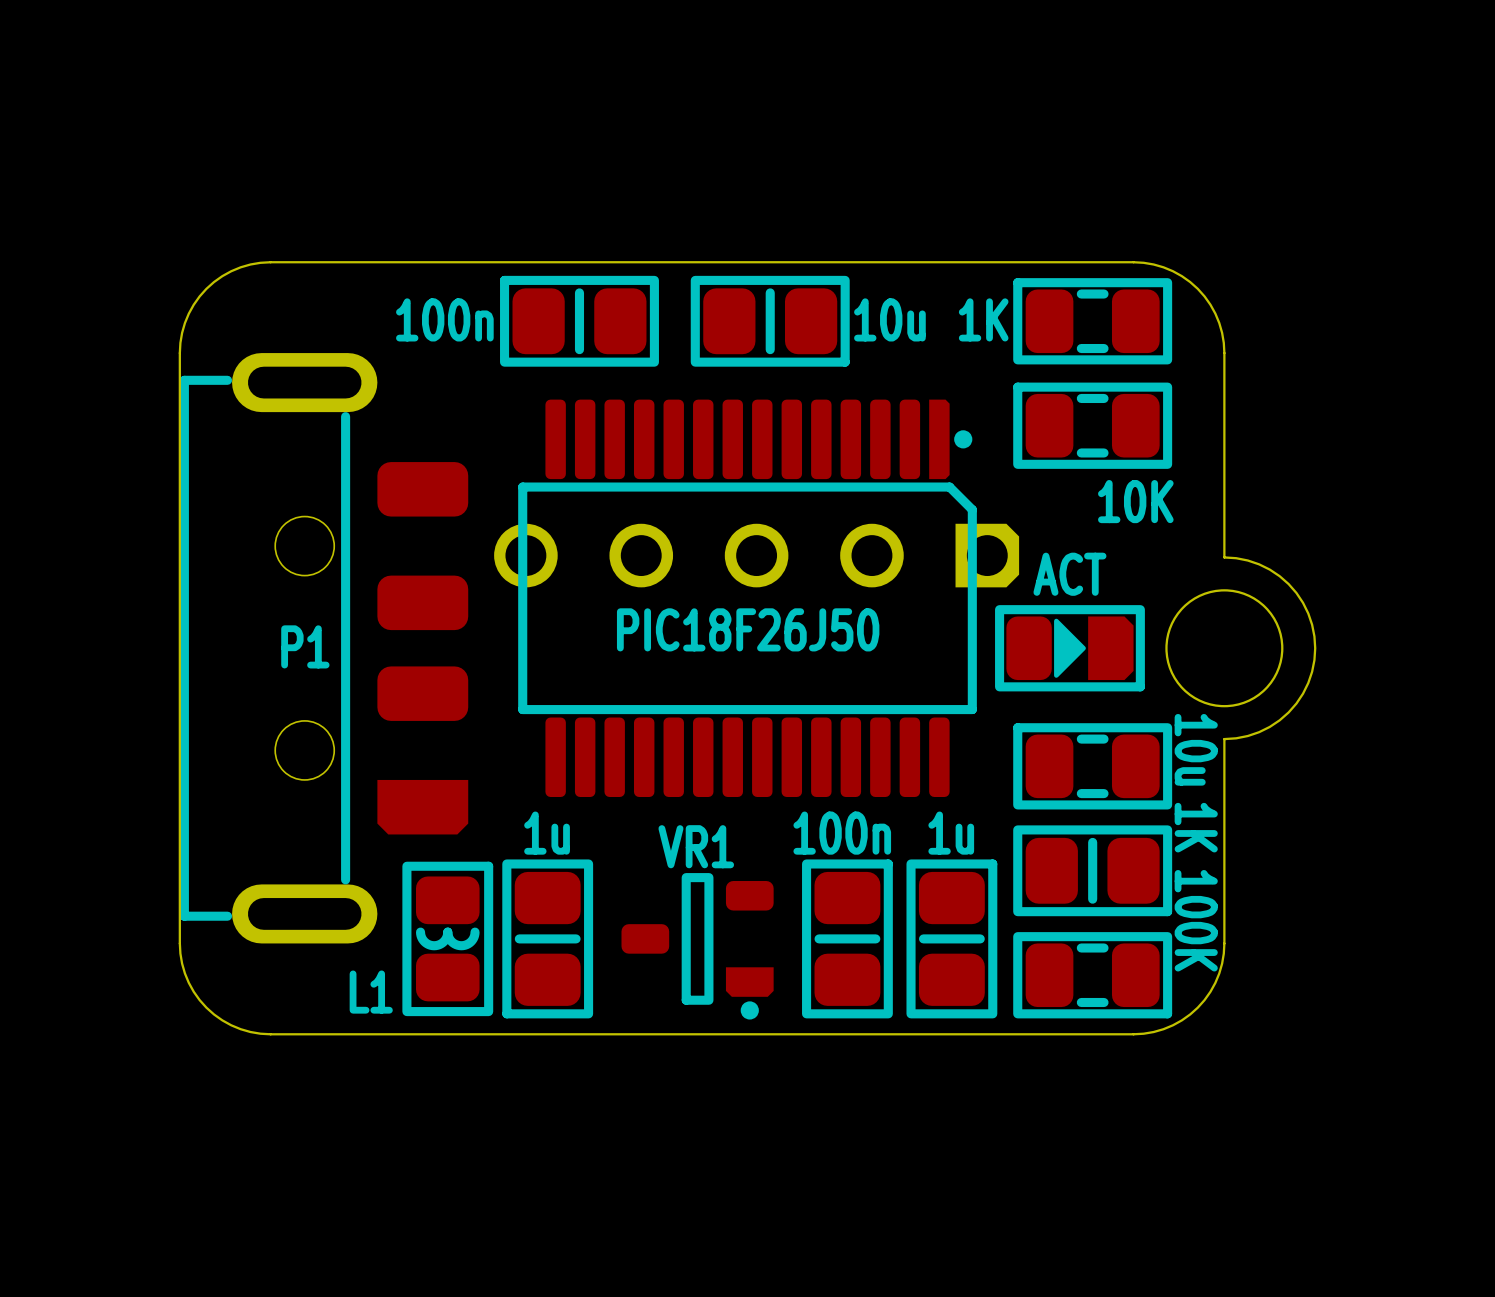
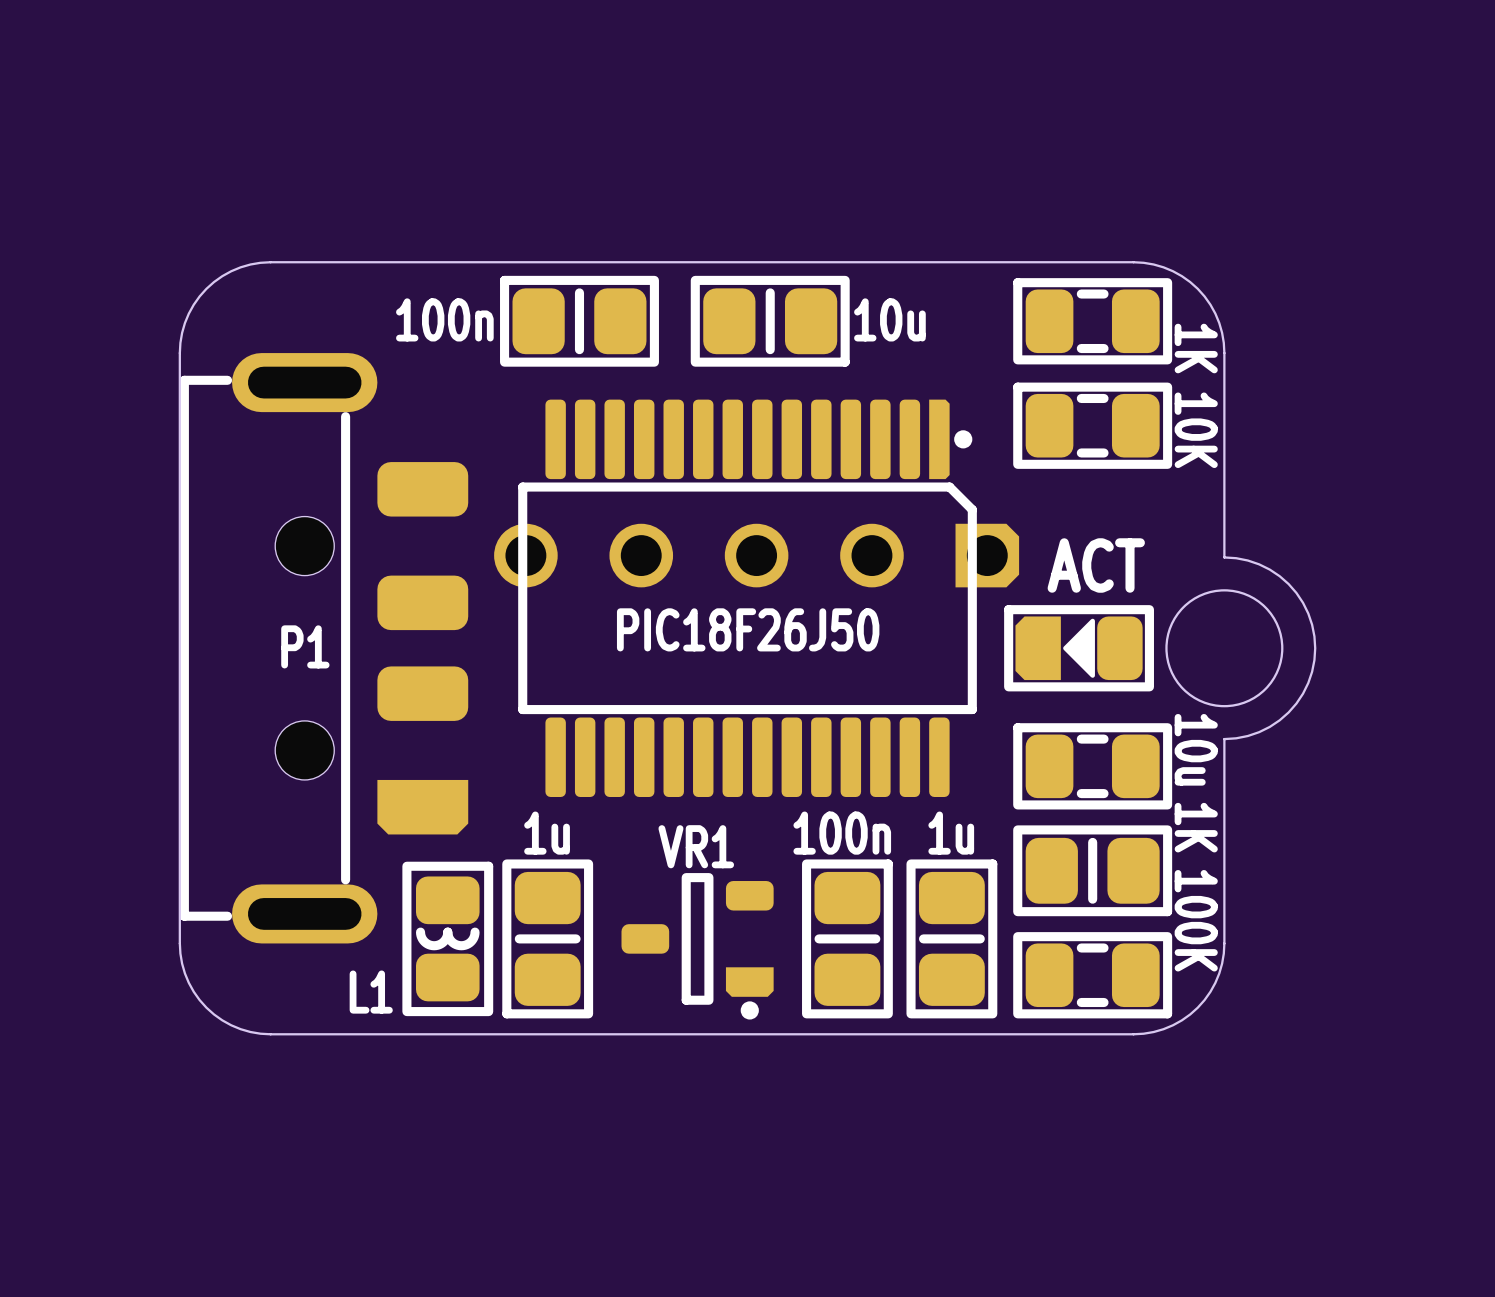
part value rotation: 0° (983, 319) -> 90° clockwise (1196, 348)
part value position: 1K (983, 319) -> 1K (1196, 348)
part value rotation: 0° (1135, 501) -> 90° clockwise (1196, 430)
part value position: 10K (1135, 501) -> 10K (1196, 430)
text: none -> ACT (1096, 565)
part value: ACT (1069, 574) -> none
part rotation: 0° (1069, 648) -> 180° (1079, 648)

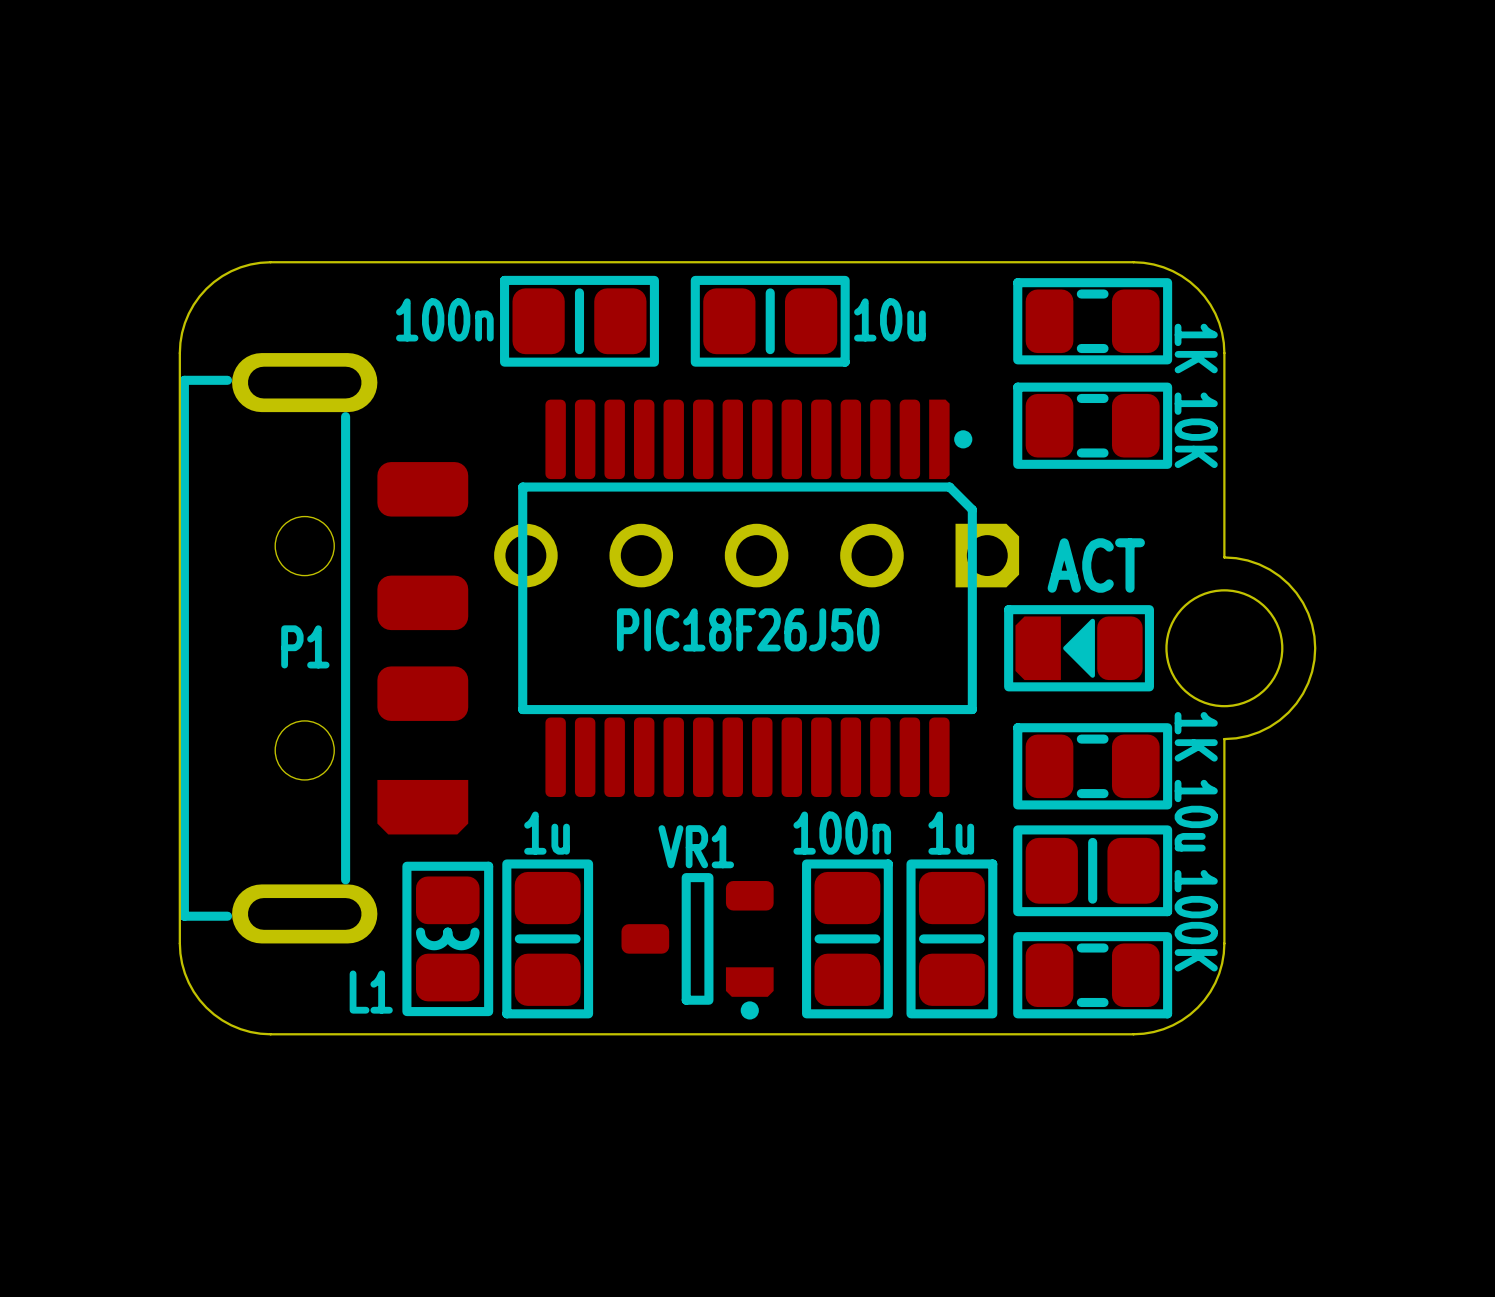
part value position: 10u (1196, 749) -> 10u (1196, 815)
part value position: 1K (1196, 827) -> 1K (1196, 736)

